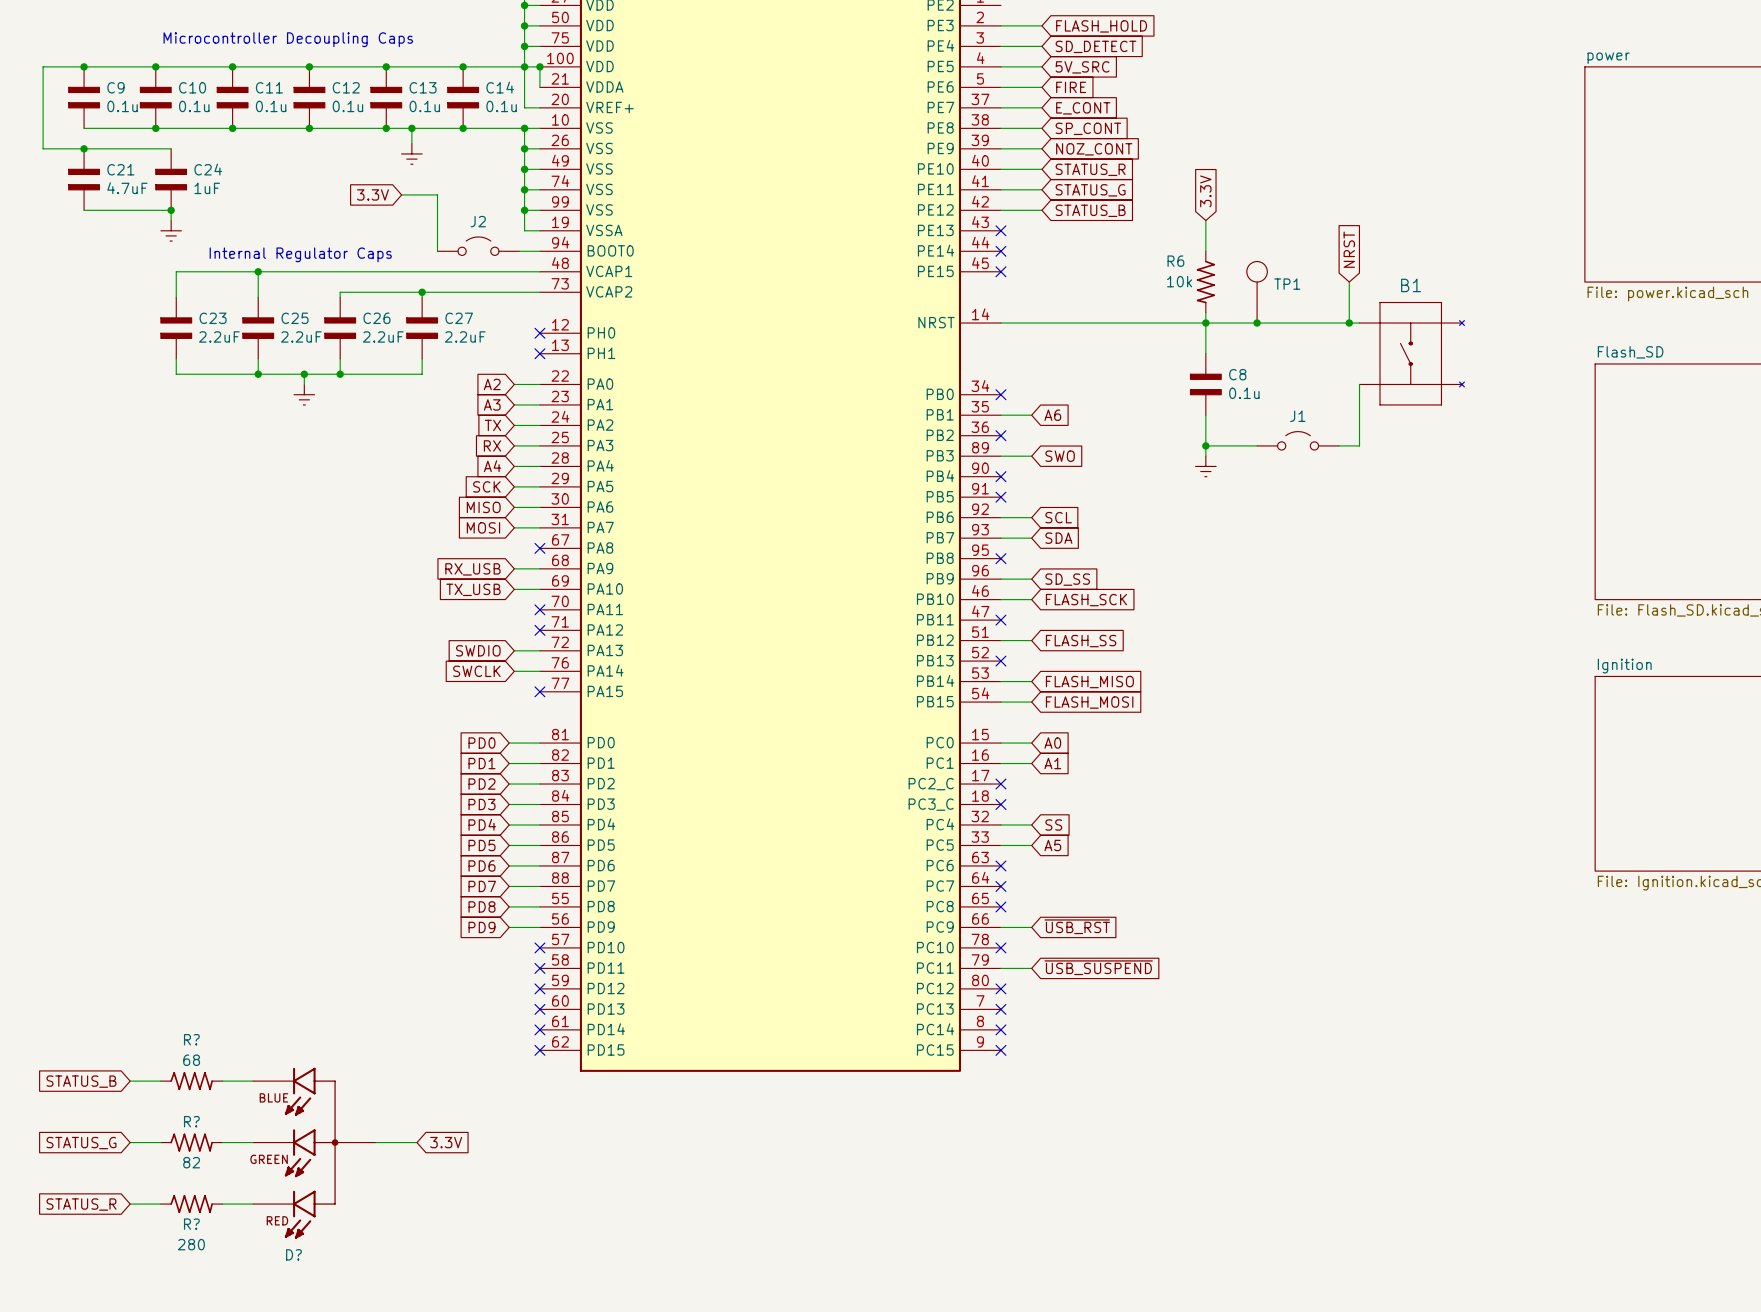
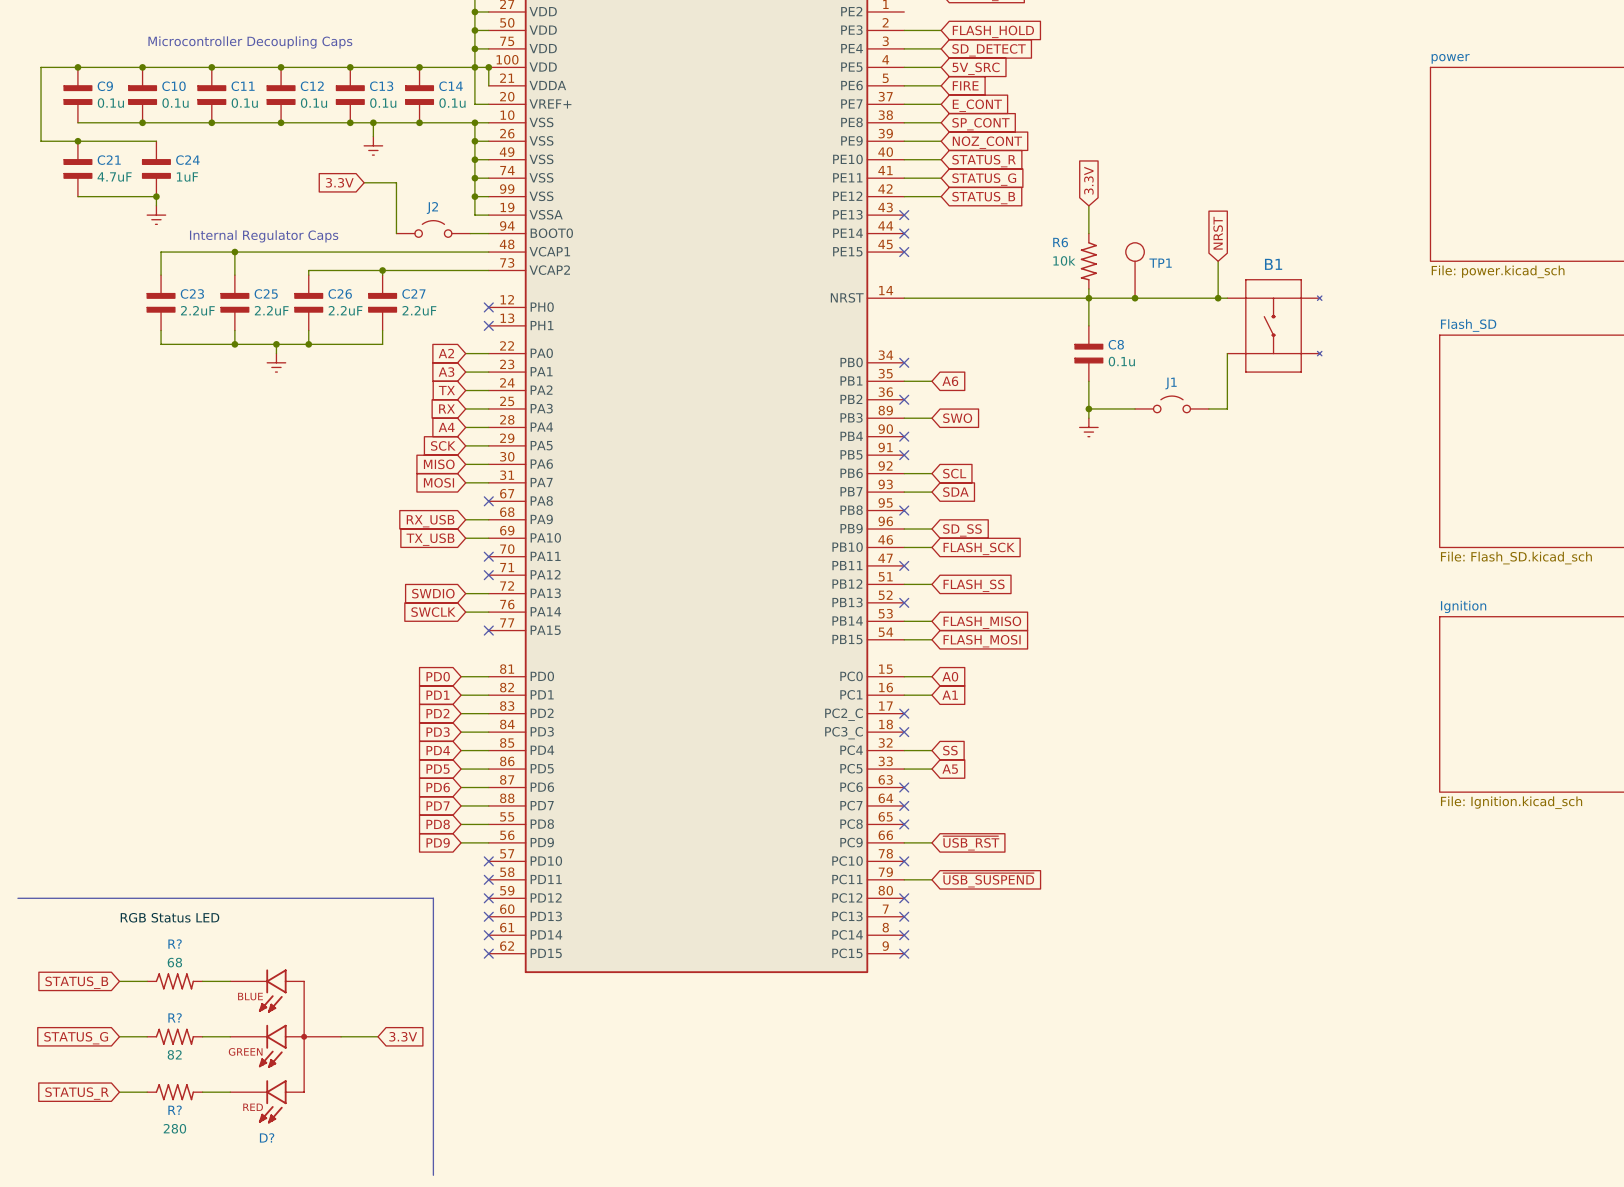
line: none -> (17, 898) (433, 898) (433, 1175)
label: none -> RGB Status LED (169, 917)

